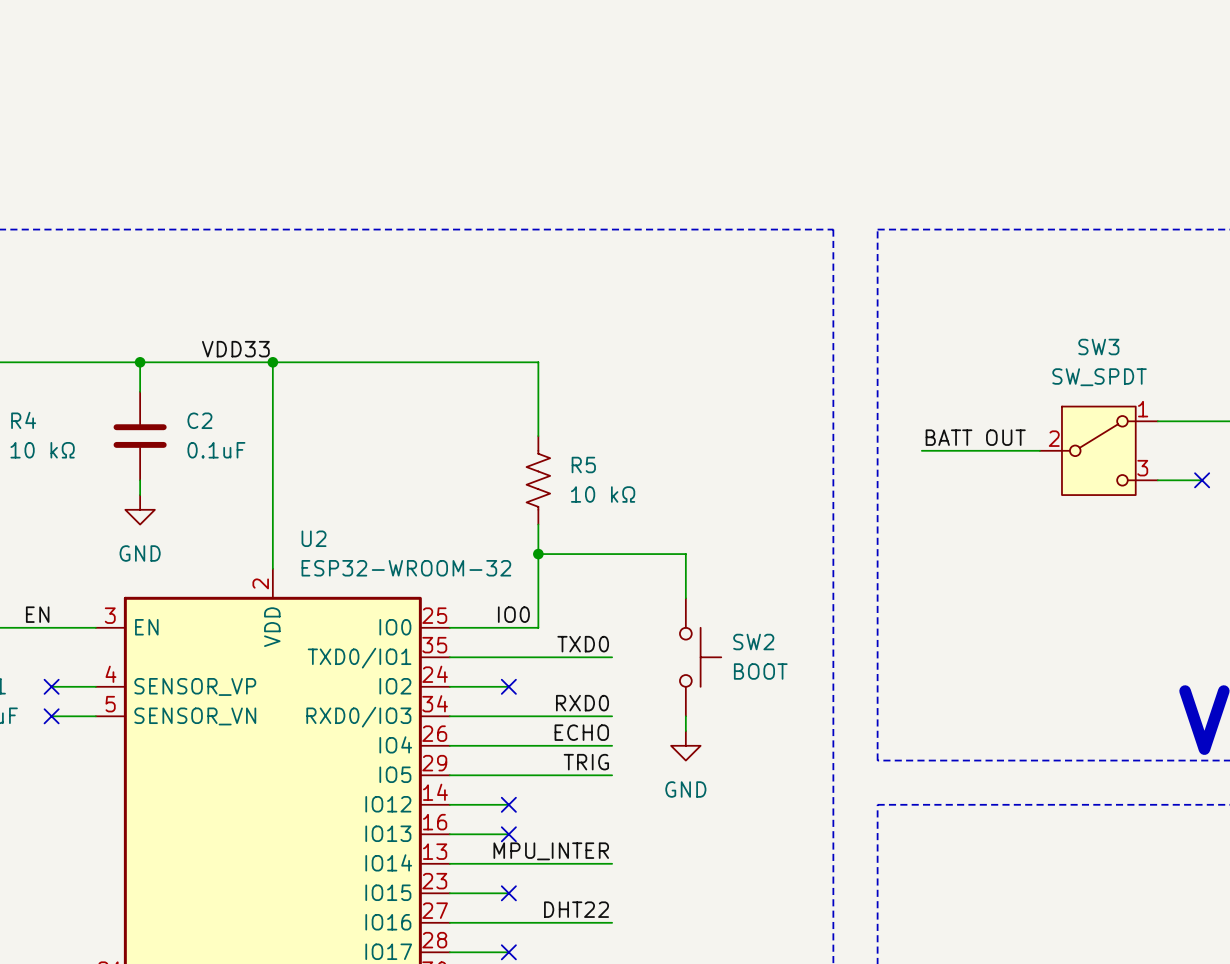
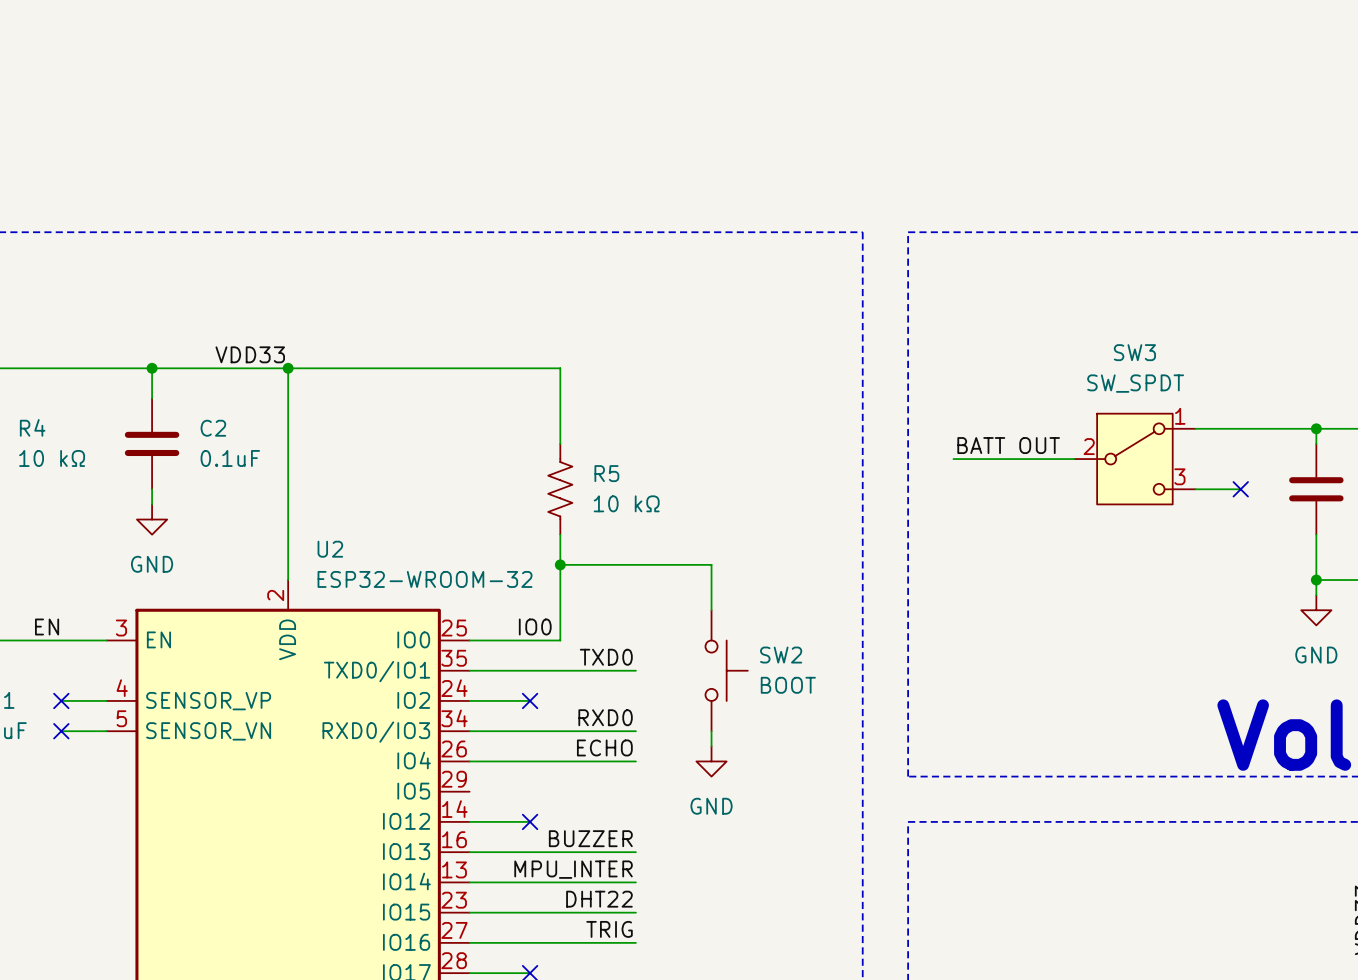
label: TRIG (586, 762) -> none
wire: (449, 775) (612, 775) -> none
label: none -> BUZZER (590, 838)
wire: none -> (530, 852) (635, 852)
no-connect mark: (508, 834) -> none
label: none -> DHT22 (599, 899)
wire: none -> (530, 912) (635, 912)
no-connect mark: (508, 893) -> none
label: DHT22 (576, 909) -> TRIG (609, 929)

